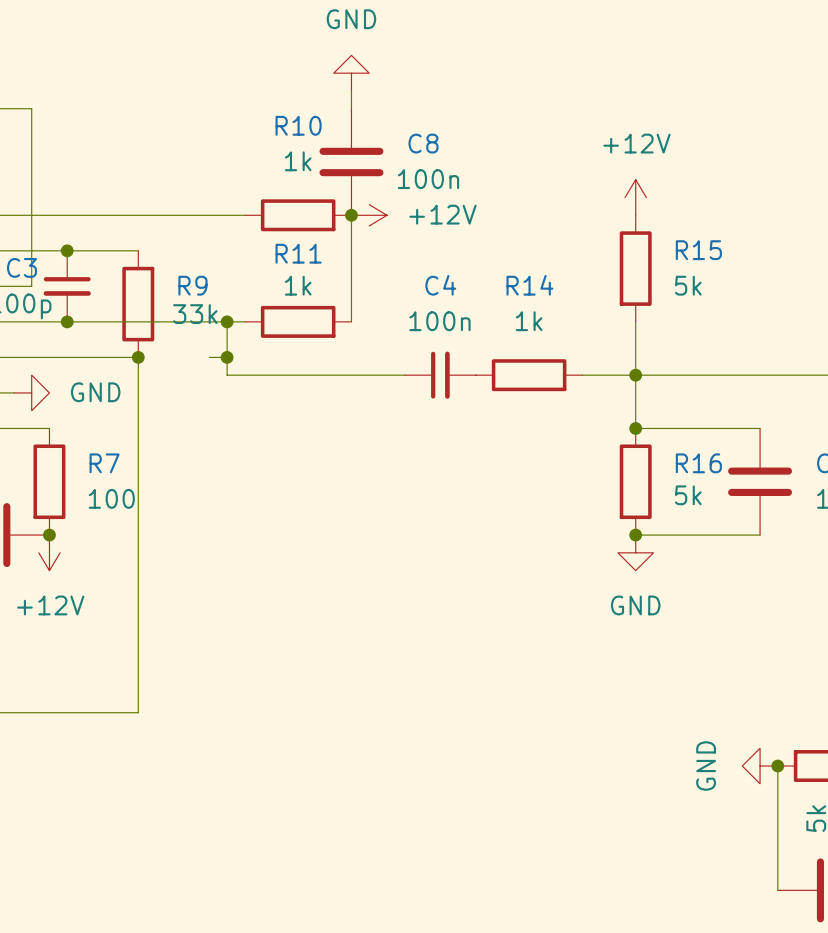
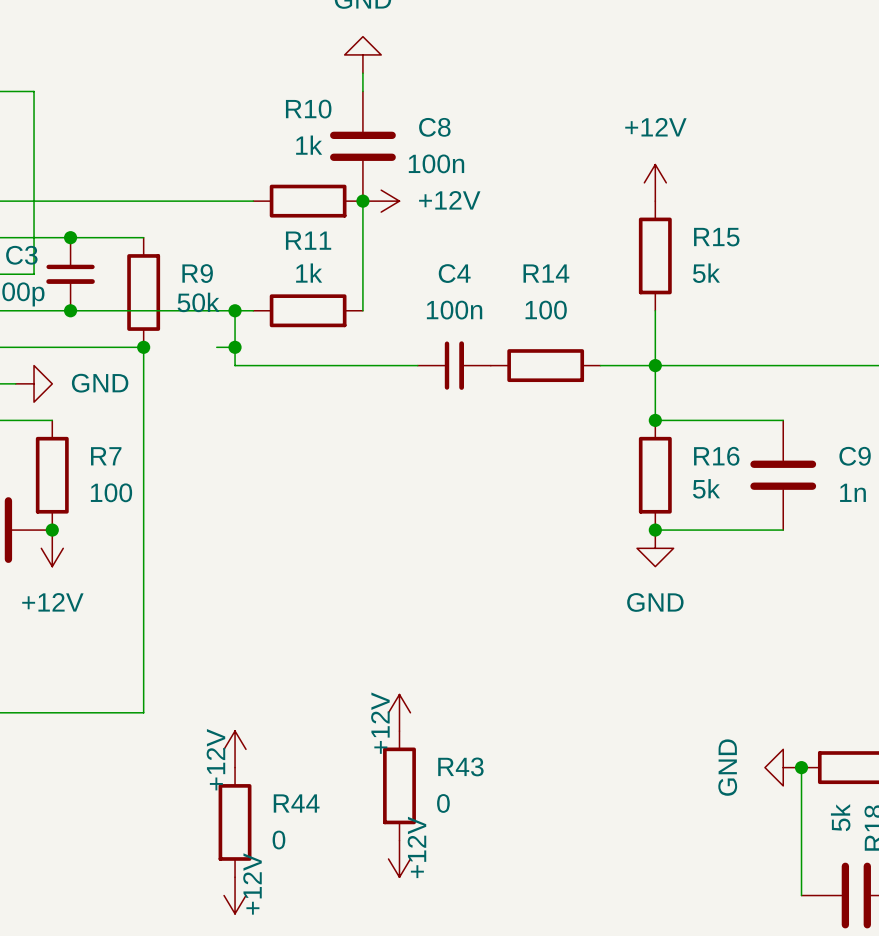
R9 value: 33k (195, 314) -> 50k (198, 302)
R14 value: 1k (529, 321) -> 100 (546, 310)
power symbol: none -> +12V (399, 712)
power symbol: none -> +12V (235, 749)
R43: none -> 0 (399, 785)
R44: none -> 0 (235, 822)
power symbol: none -> +12V (399, 858)
power symbol: none -> +12V (235, 895)

